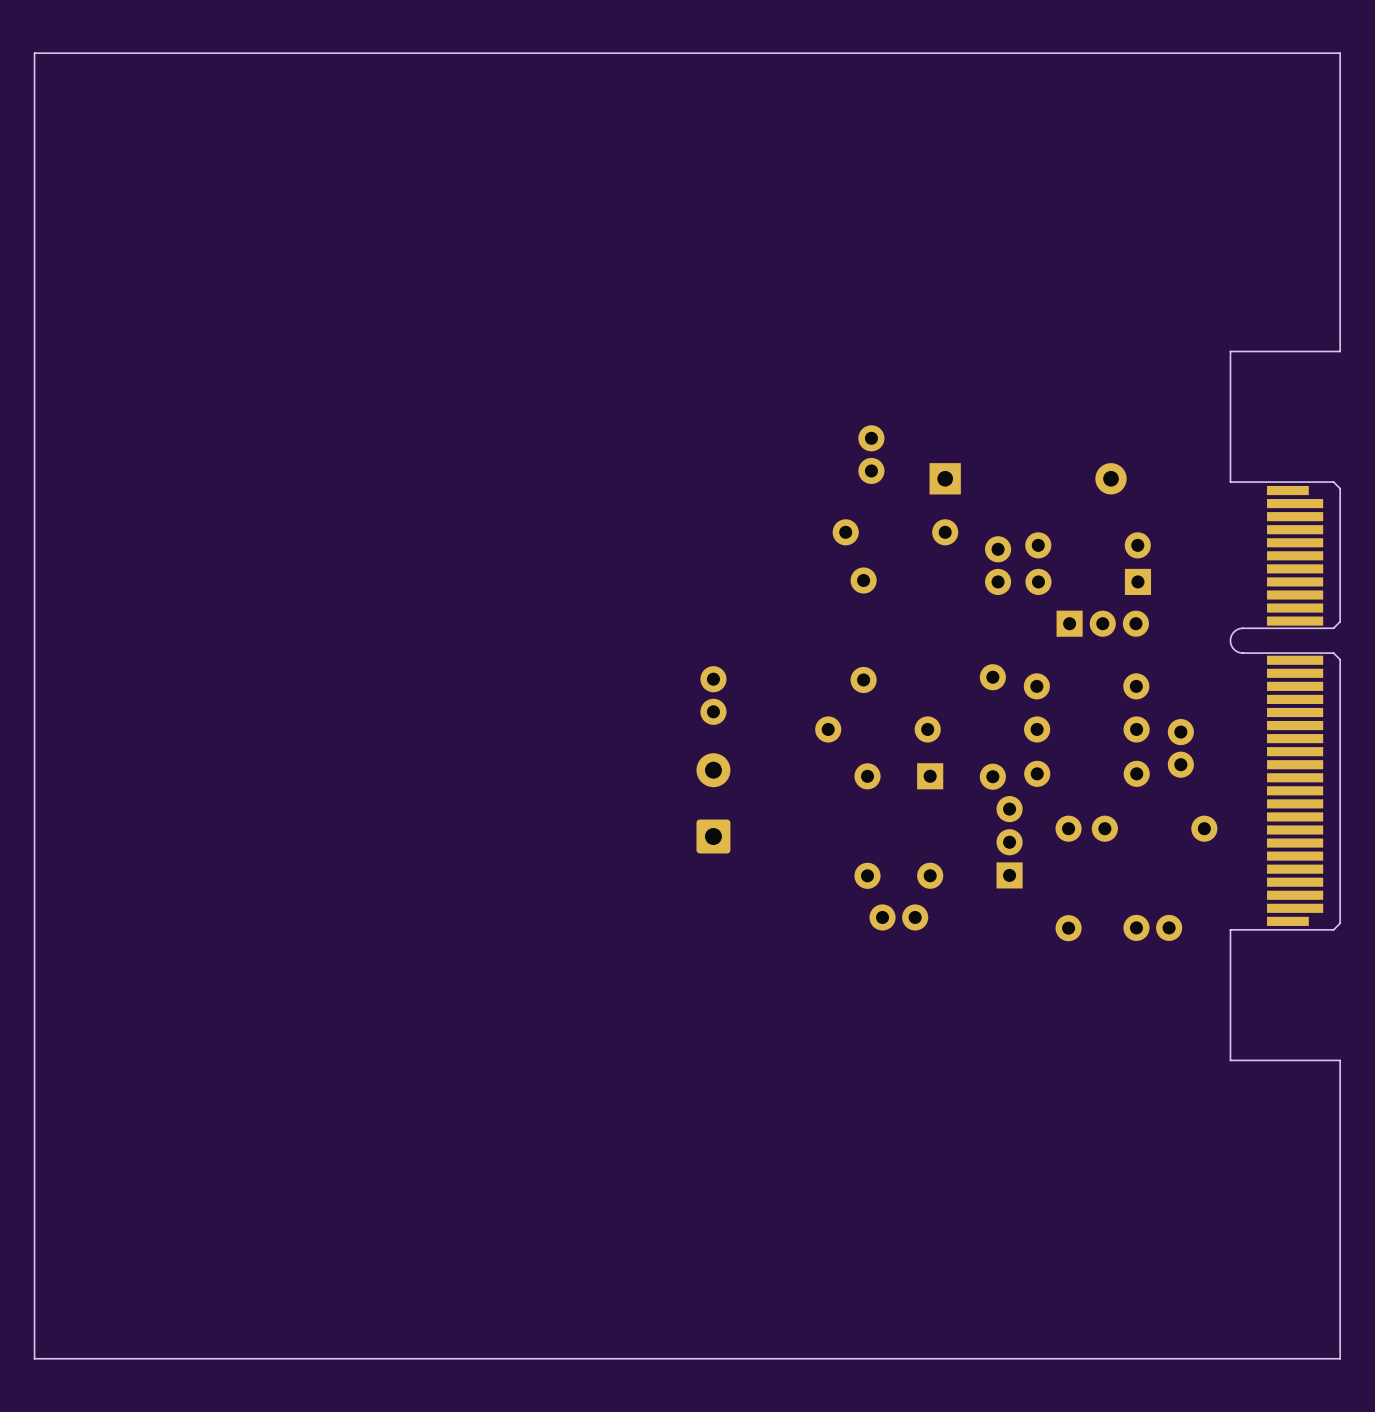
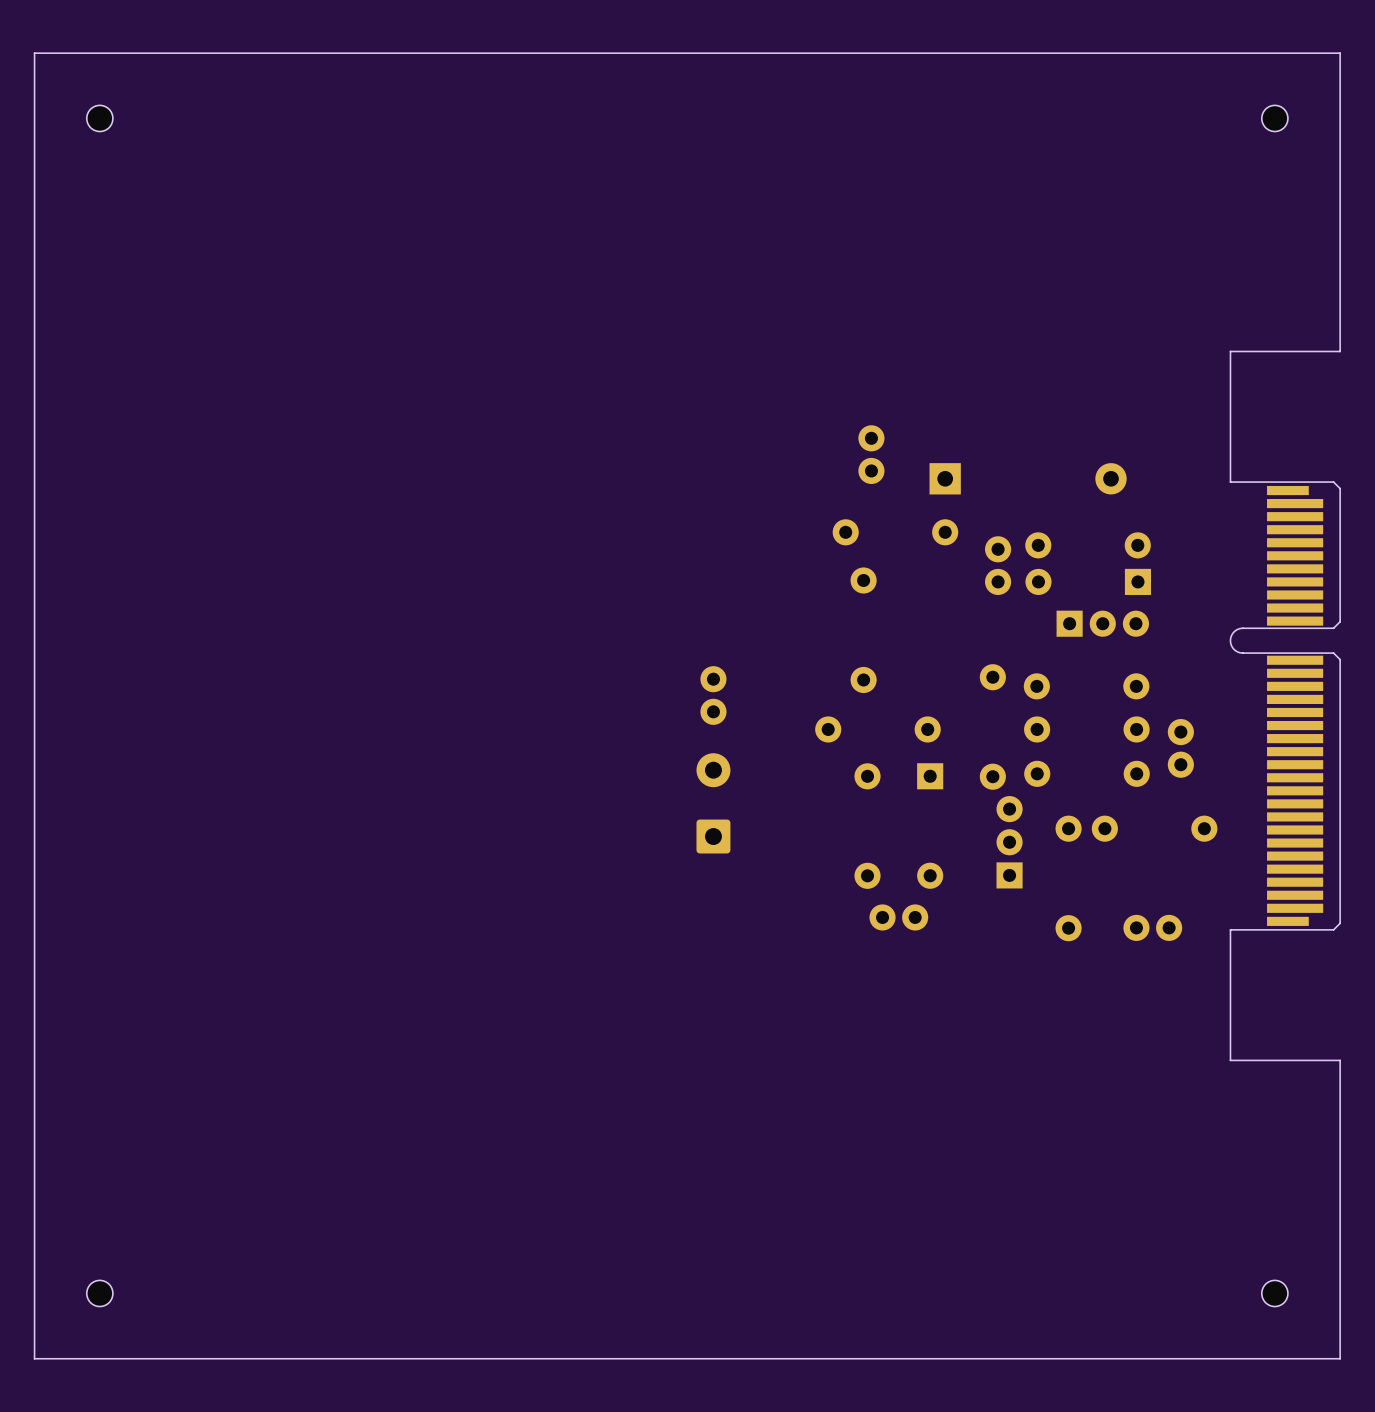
part: none -> (99, 118)
part: none -> (1274, 118)
part: none -> (99, 1293)
part: none -> (1274, 1293)

